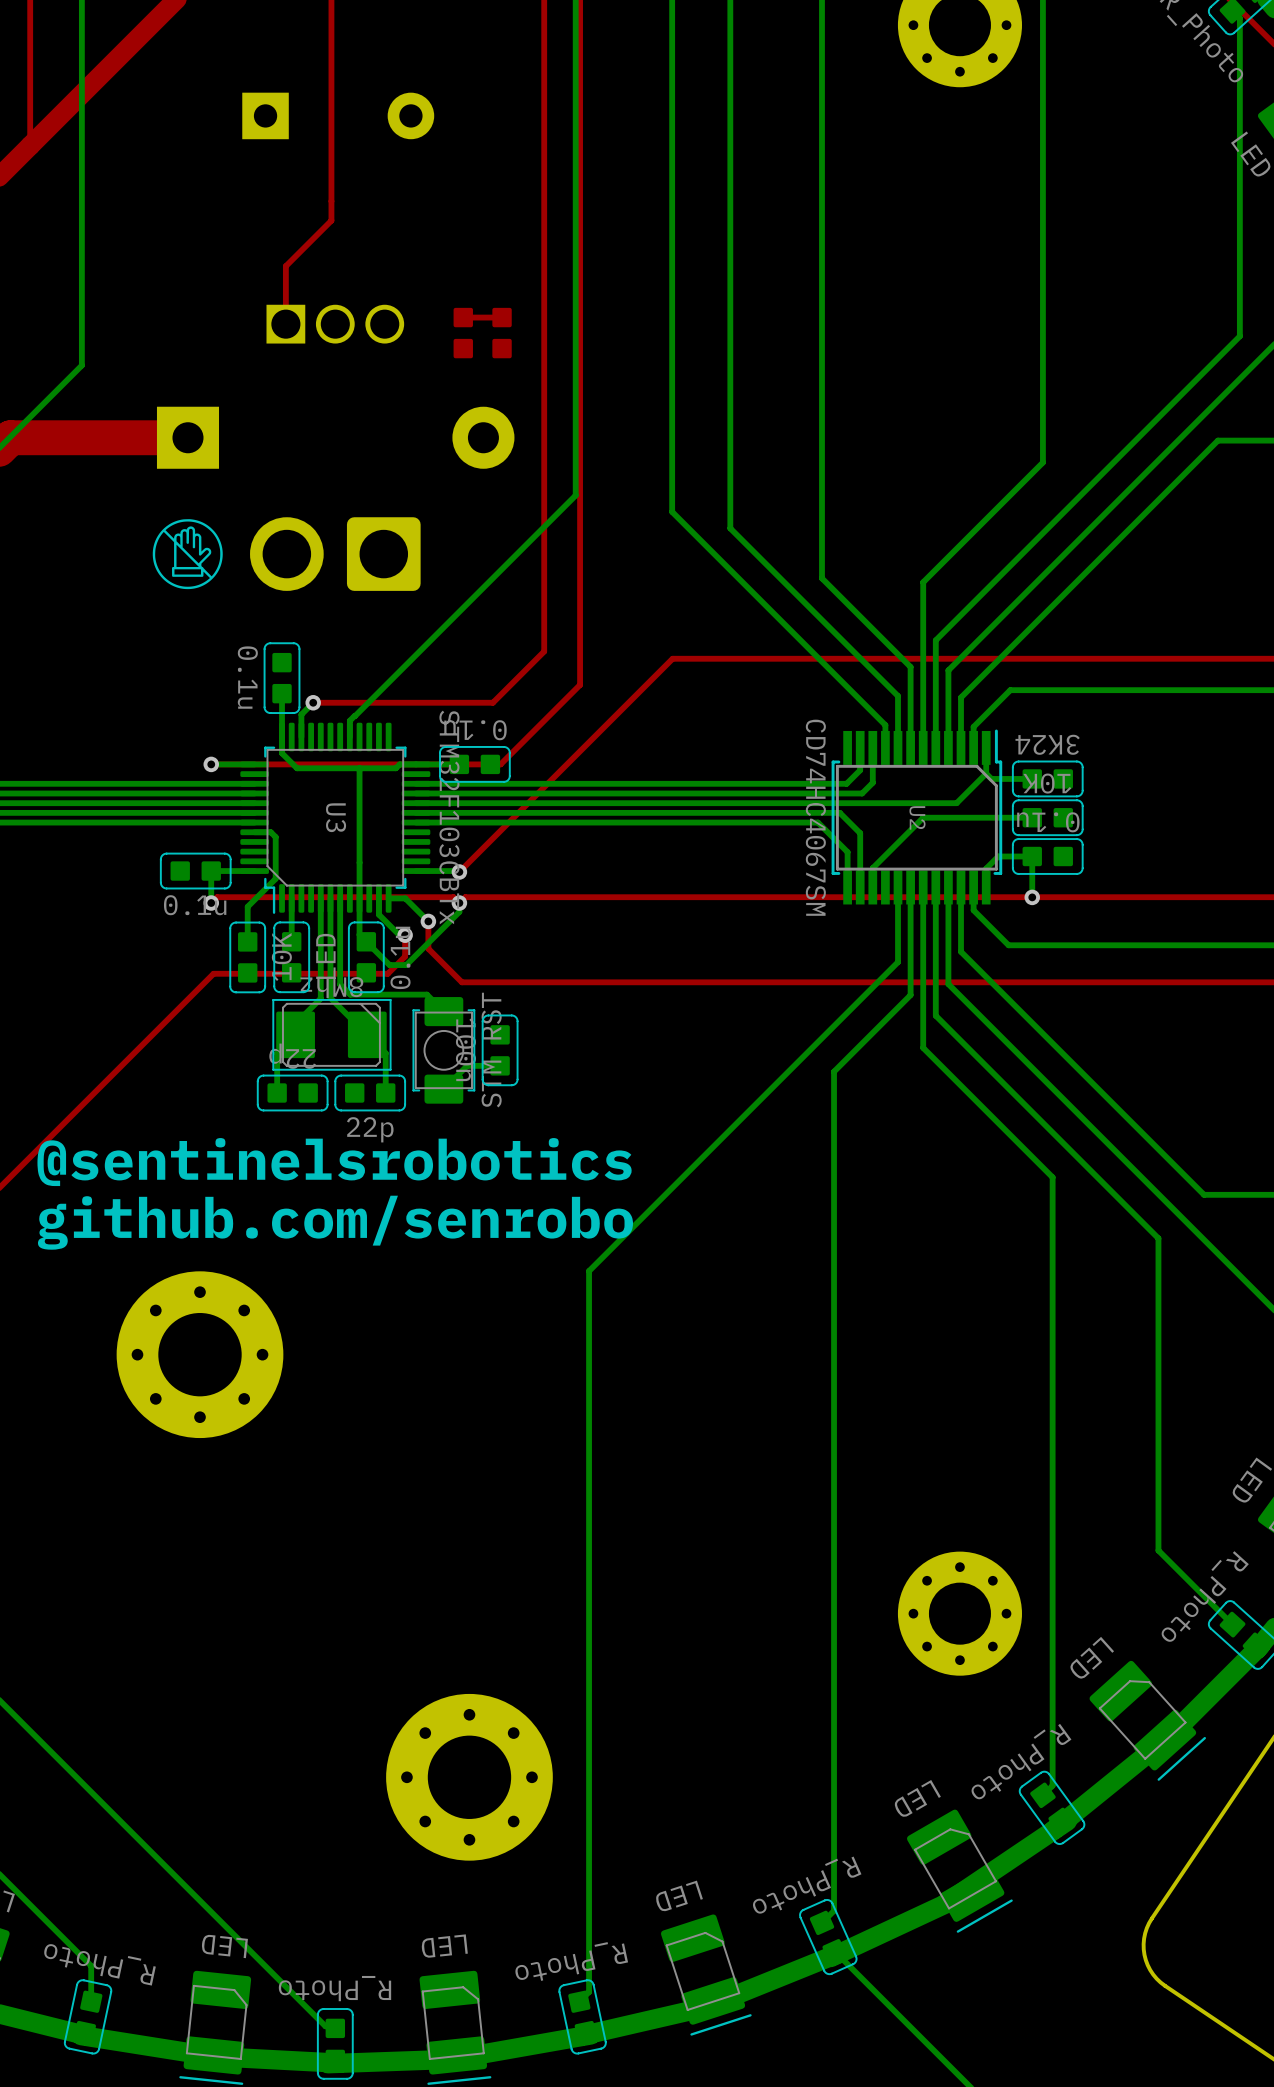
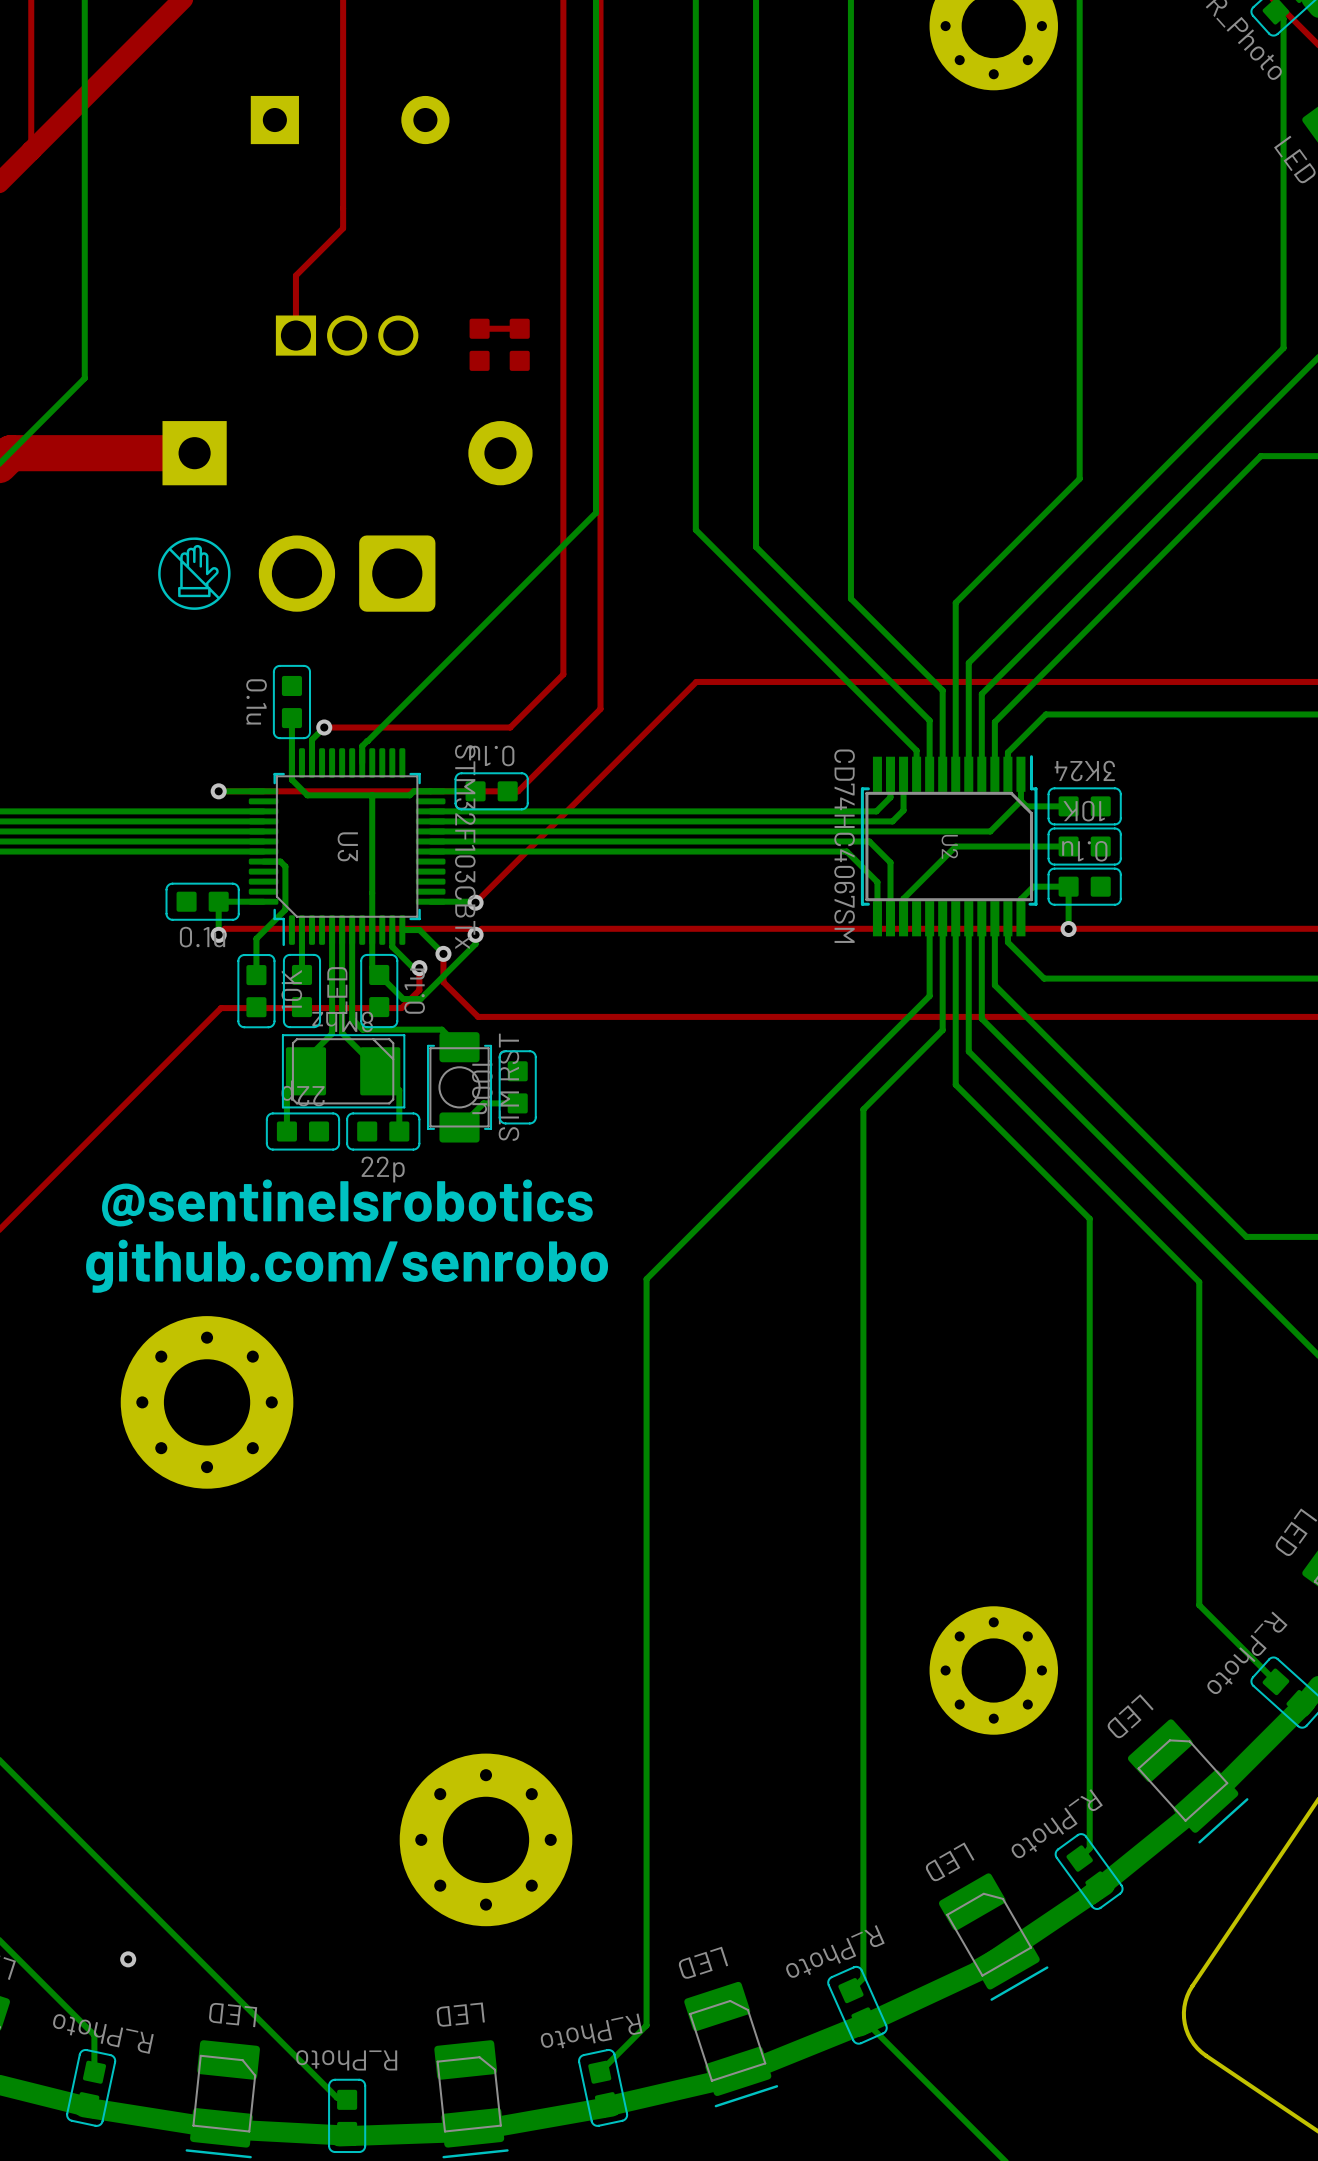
bottom track: (624, 1235) (589, 1271) (589, 1992) -> (646, 1279) (646, 2025) (609, 2062)
via: none -> (128, 1959)

